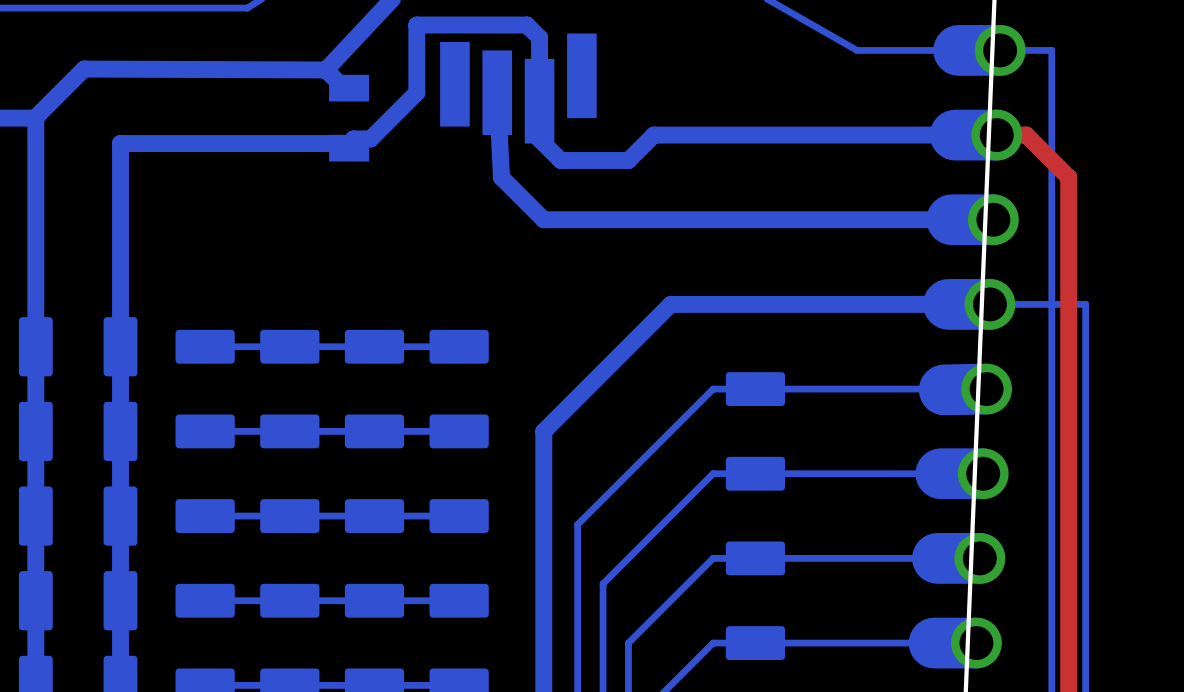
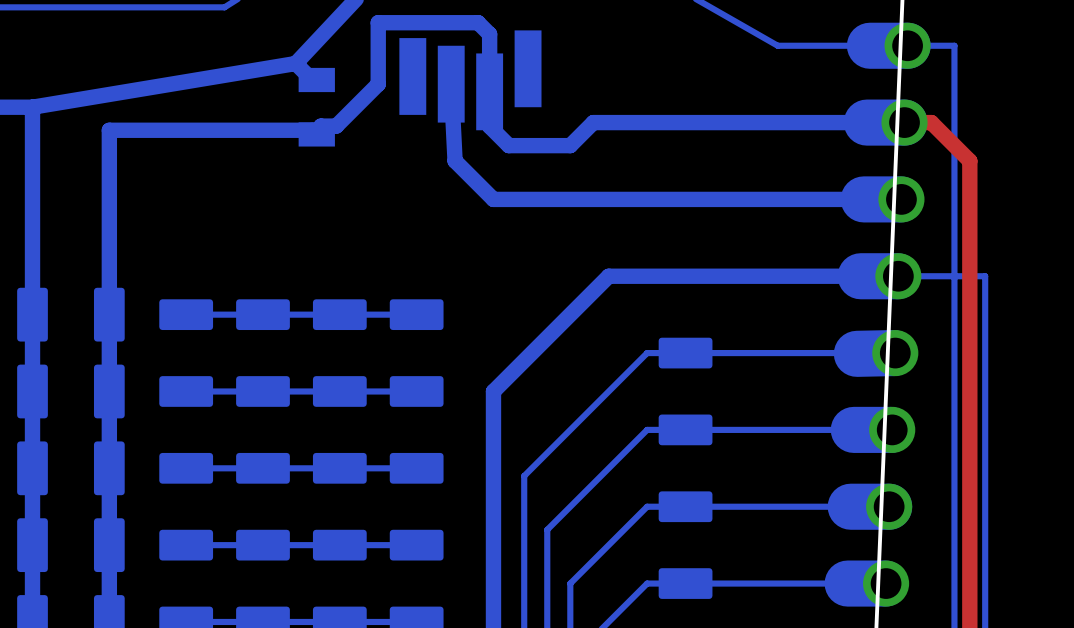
bottom track: (325, 69) (84, 69) (35, 118) -> (295, 63) (32, 107)

